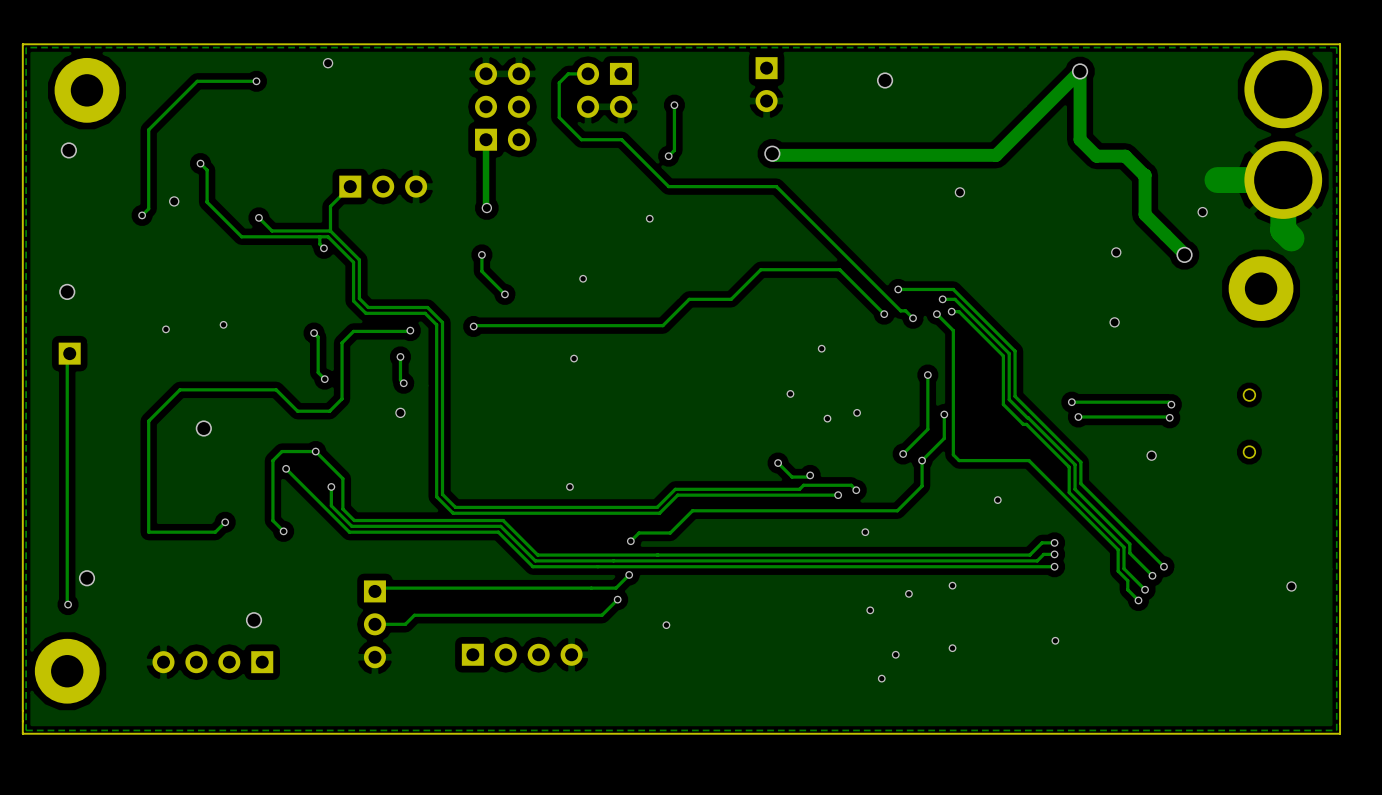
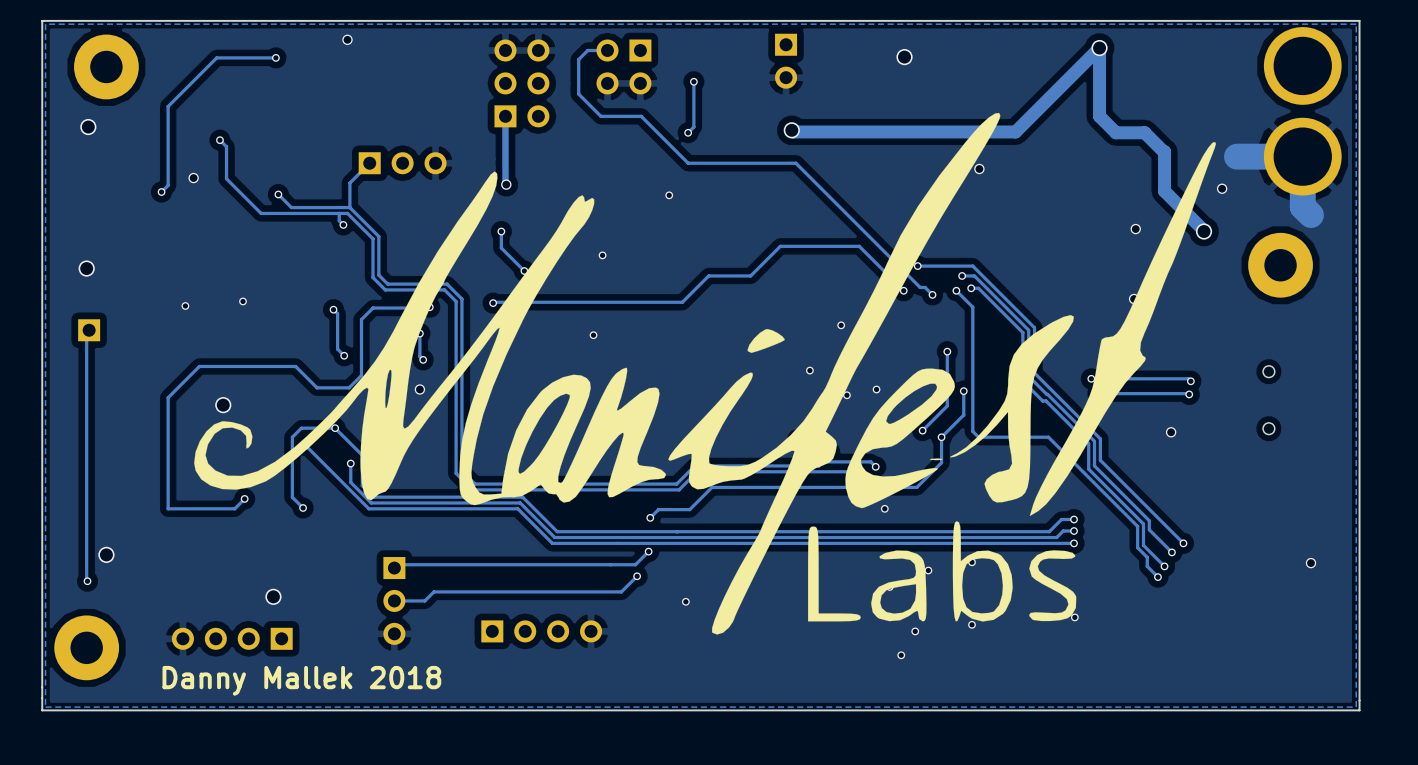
drawing: none -> [194, 112, 1216, 635]
text: none -> Danny Mallek 2018 (301, 680)

